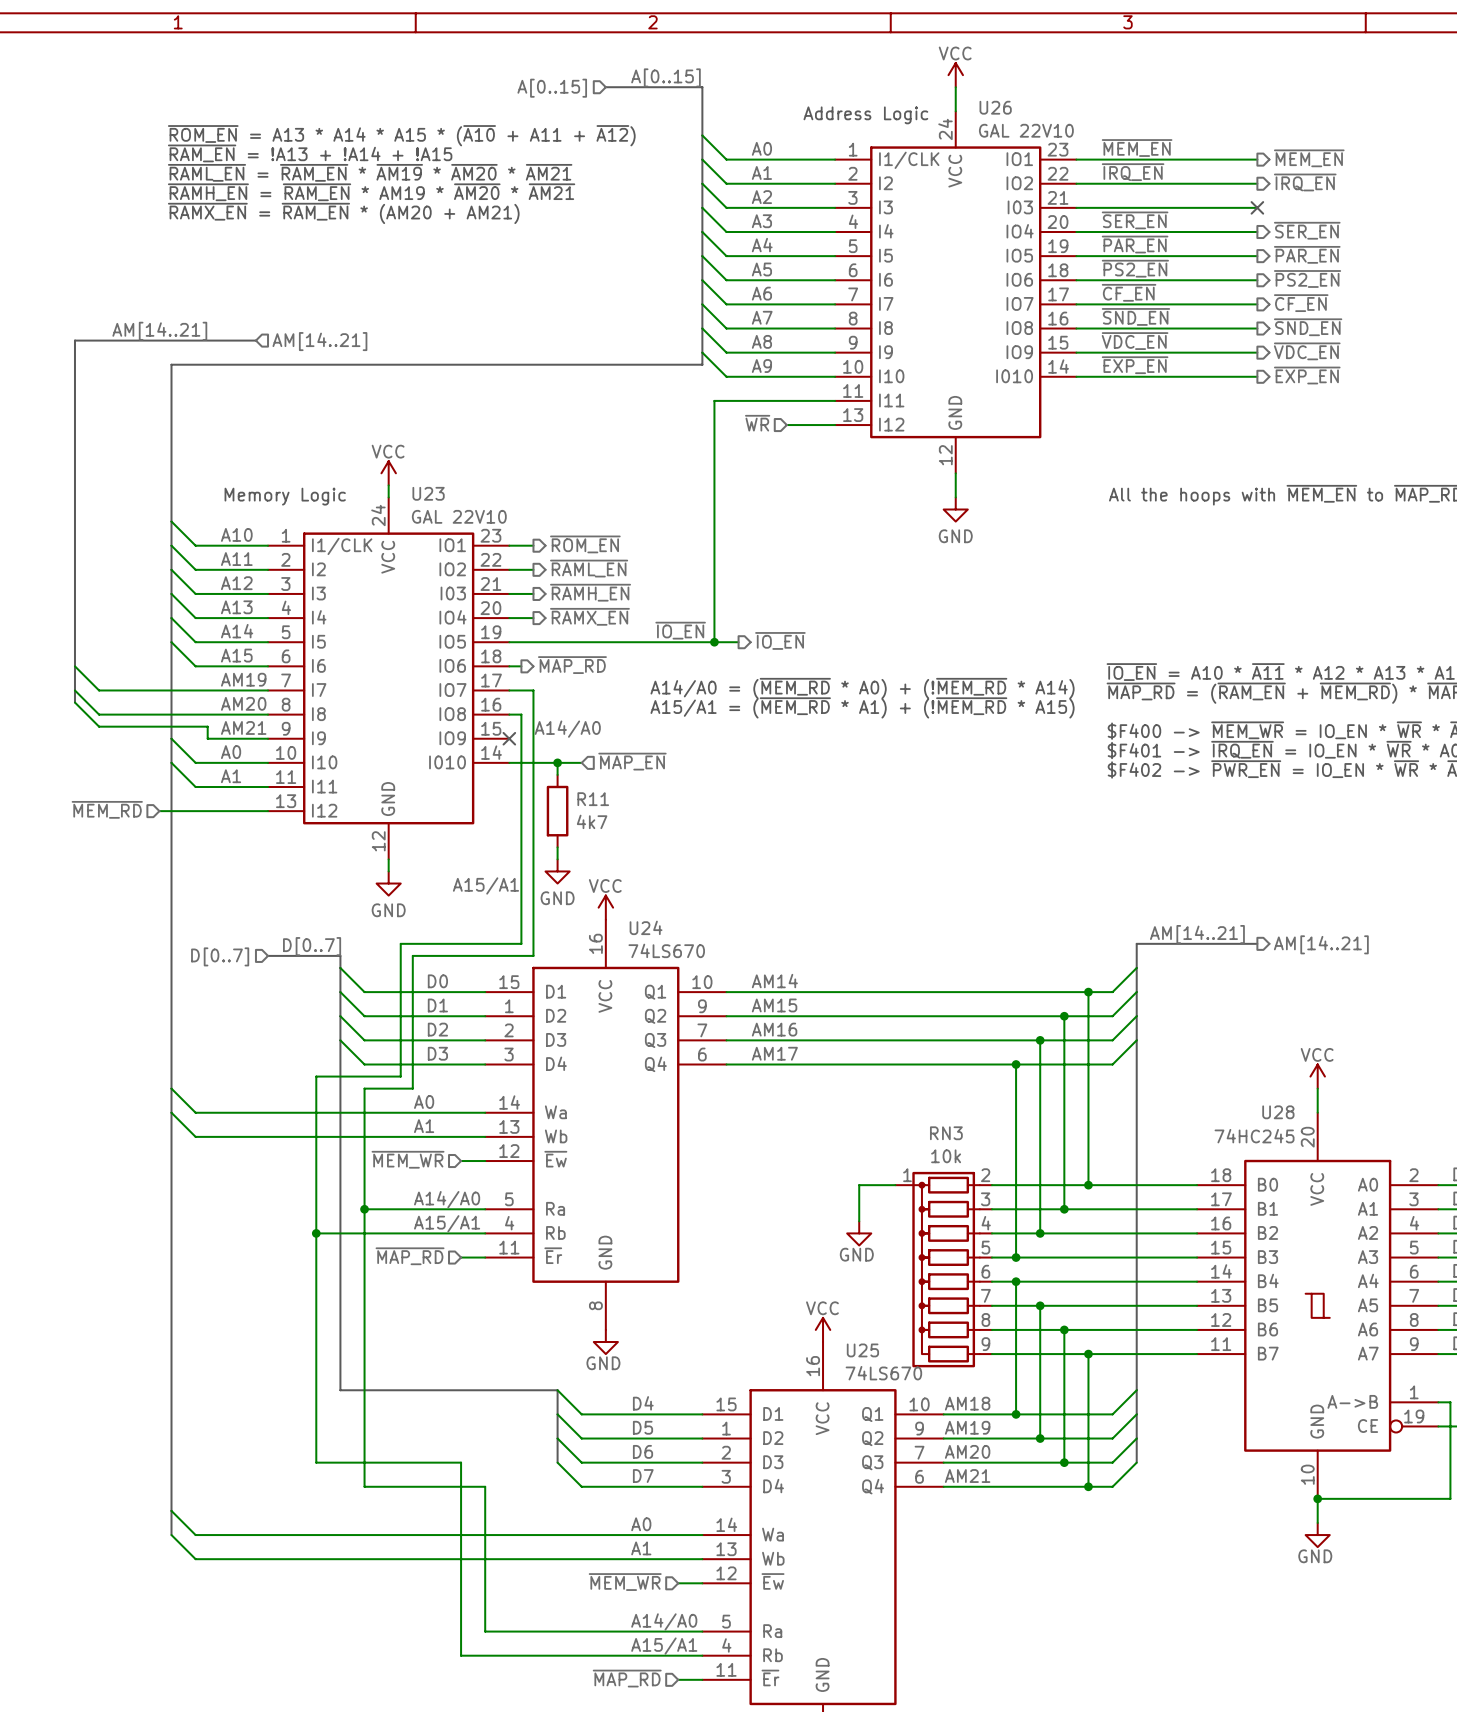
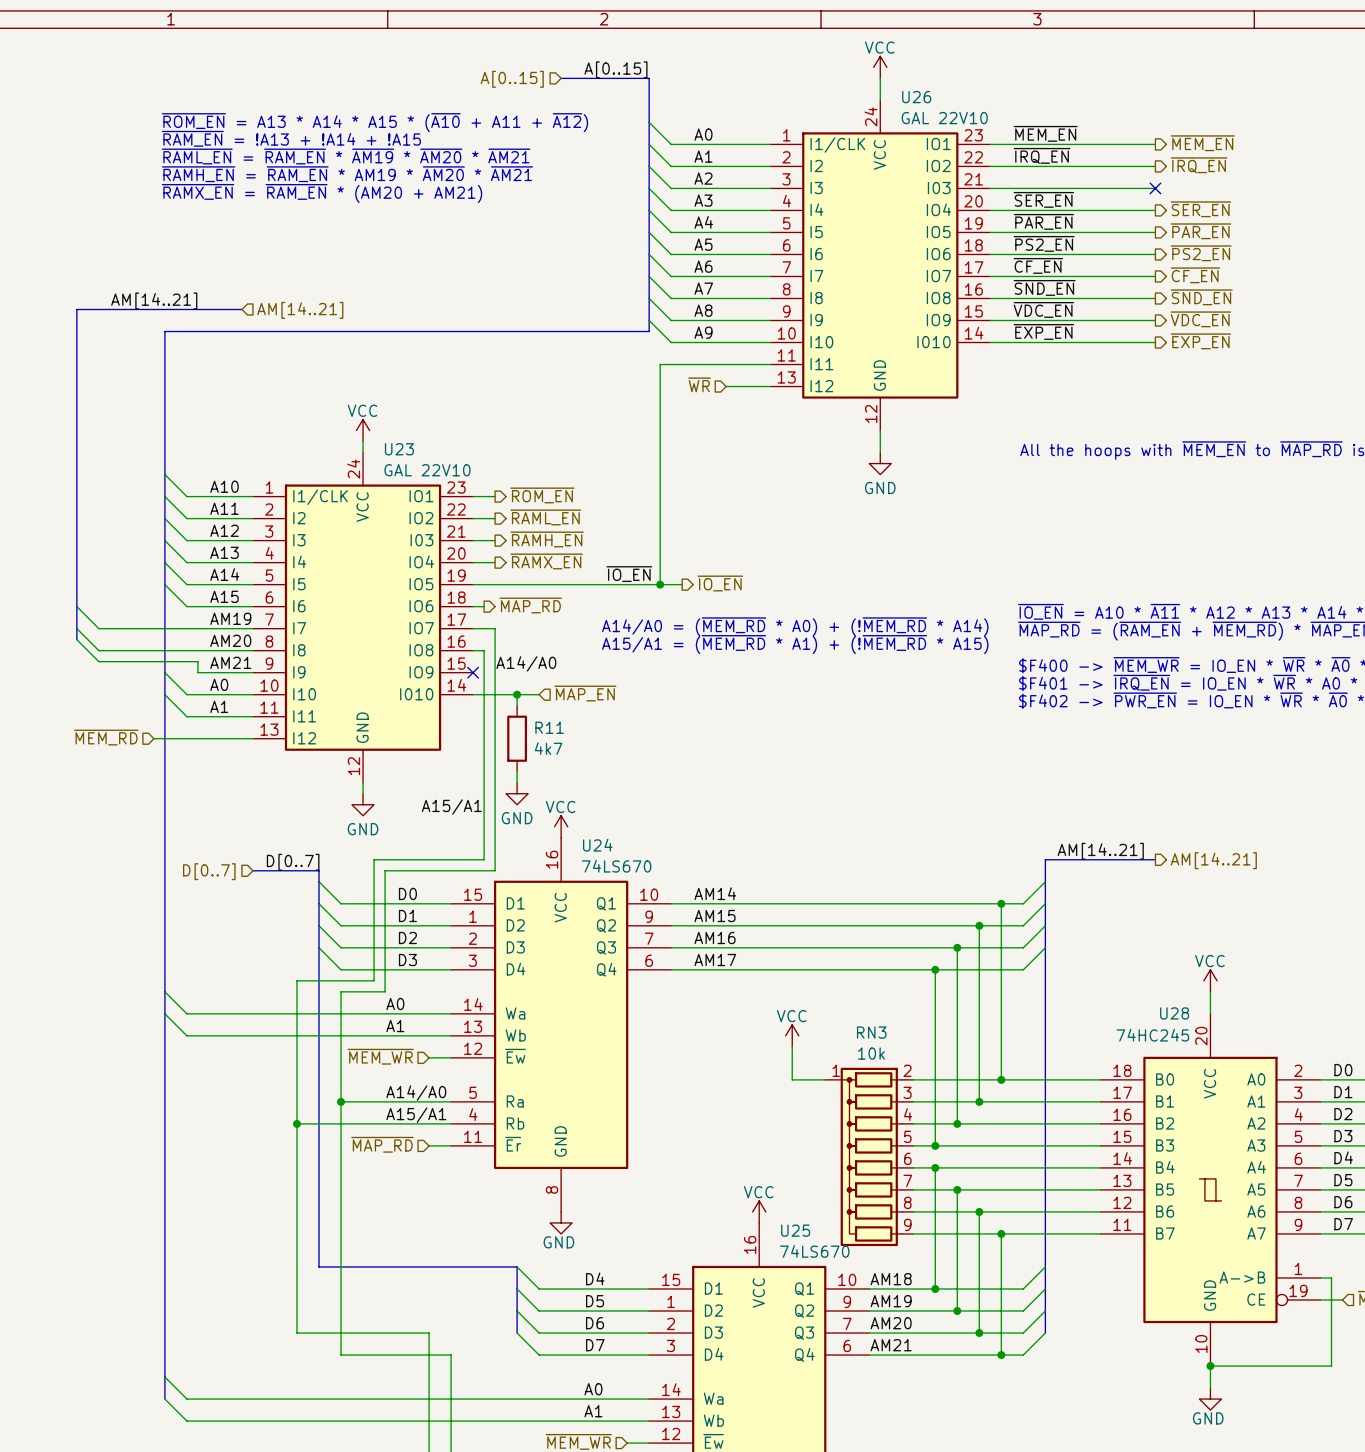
text: Address Logic (865, 115) -> none
text: Memory Logic (285, 496) -> none
power symbol: none -> VCC (792, 1035)
wire: (859, 1185) (859, 1221) -> (792, 1079) (792, 1046)
power symbol: GND (859, 1233) -> none

